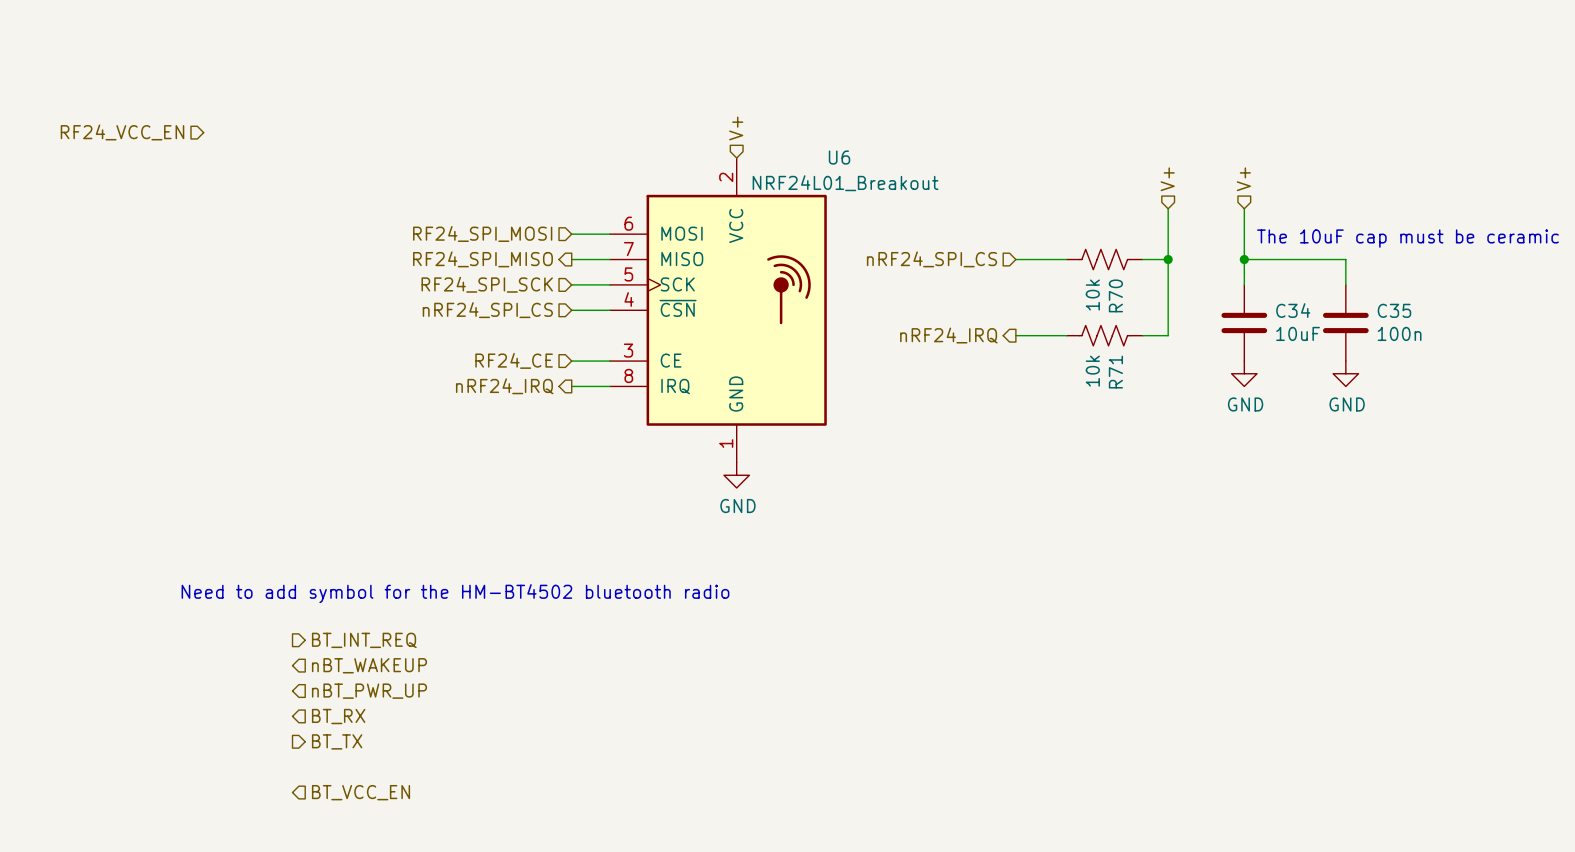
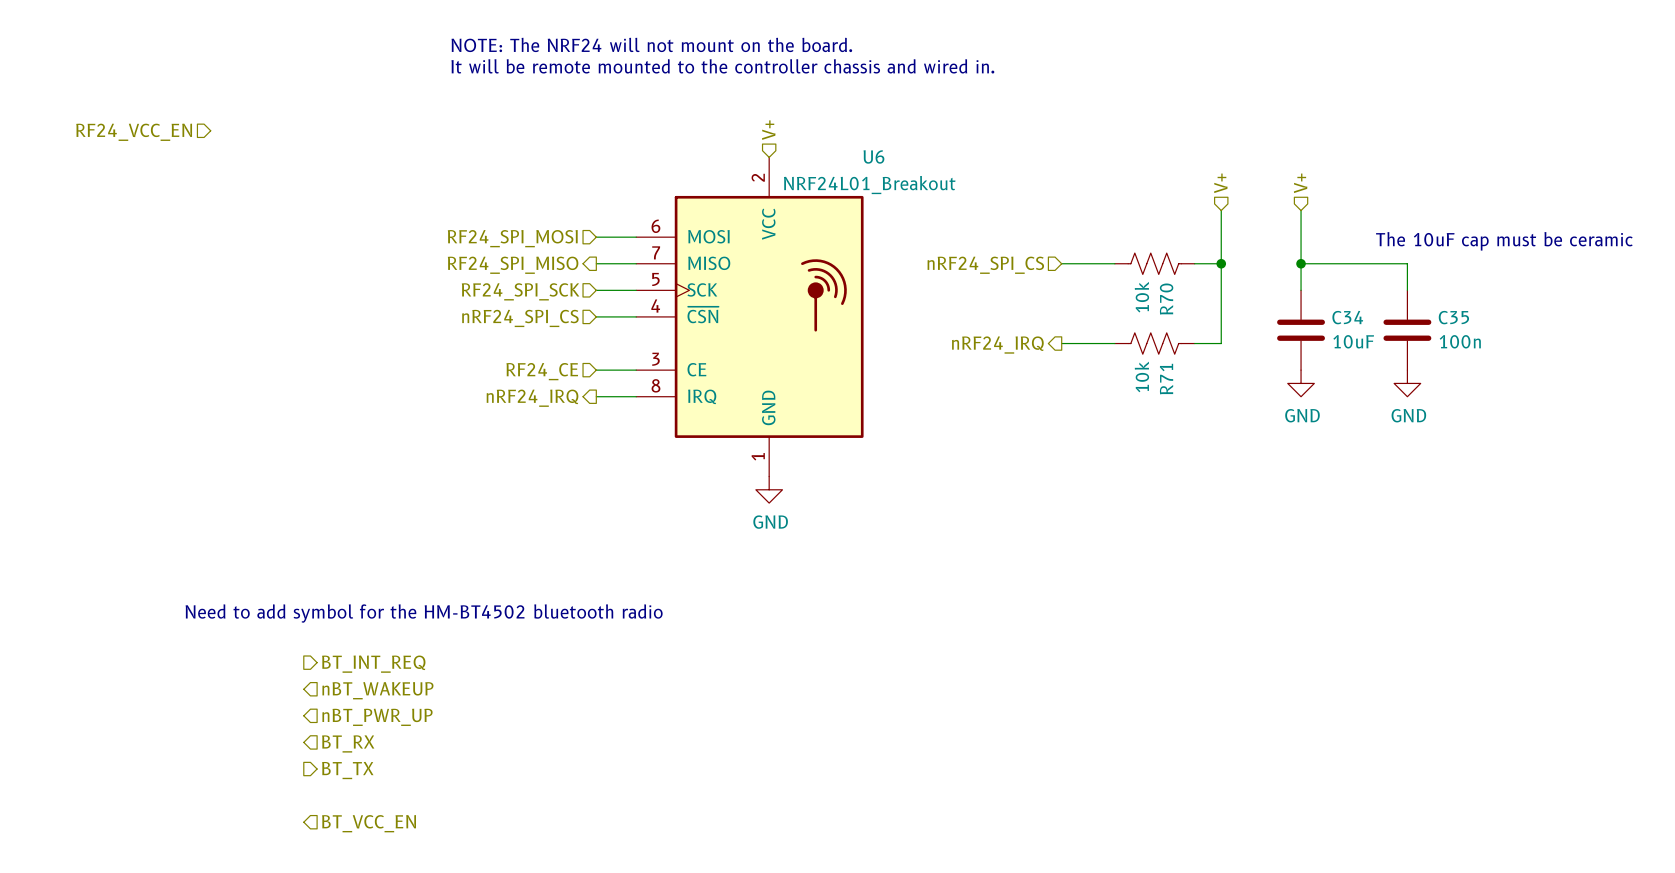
text: none -> NOTE: The NRF24 will not mount on the board. (651, 44)
text: none -> It will be remote mounted to the controller chassis and wired in. (722, 66)

